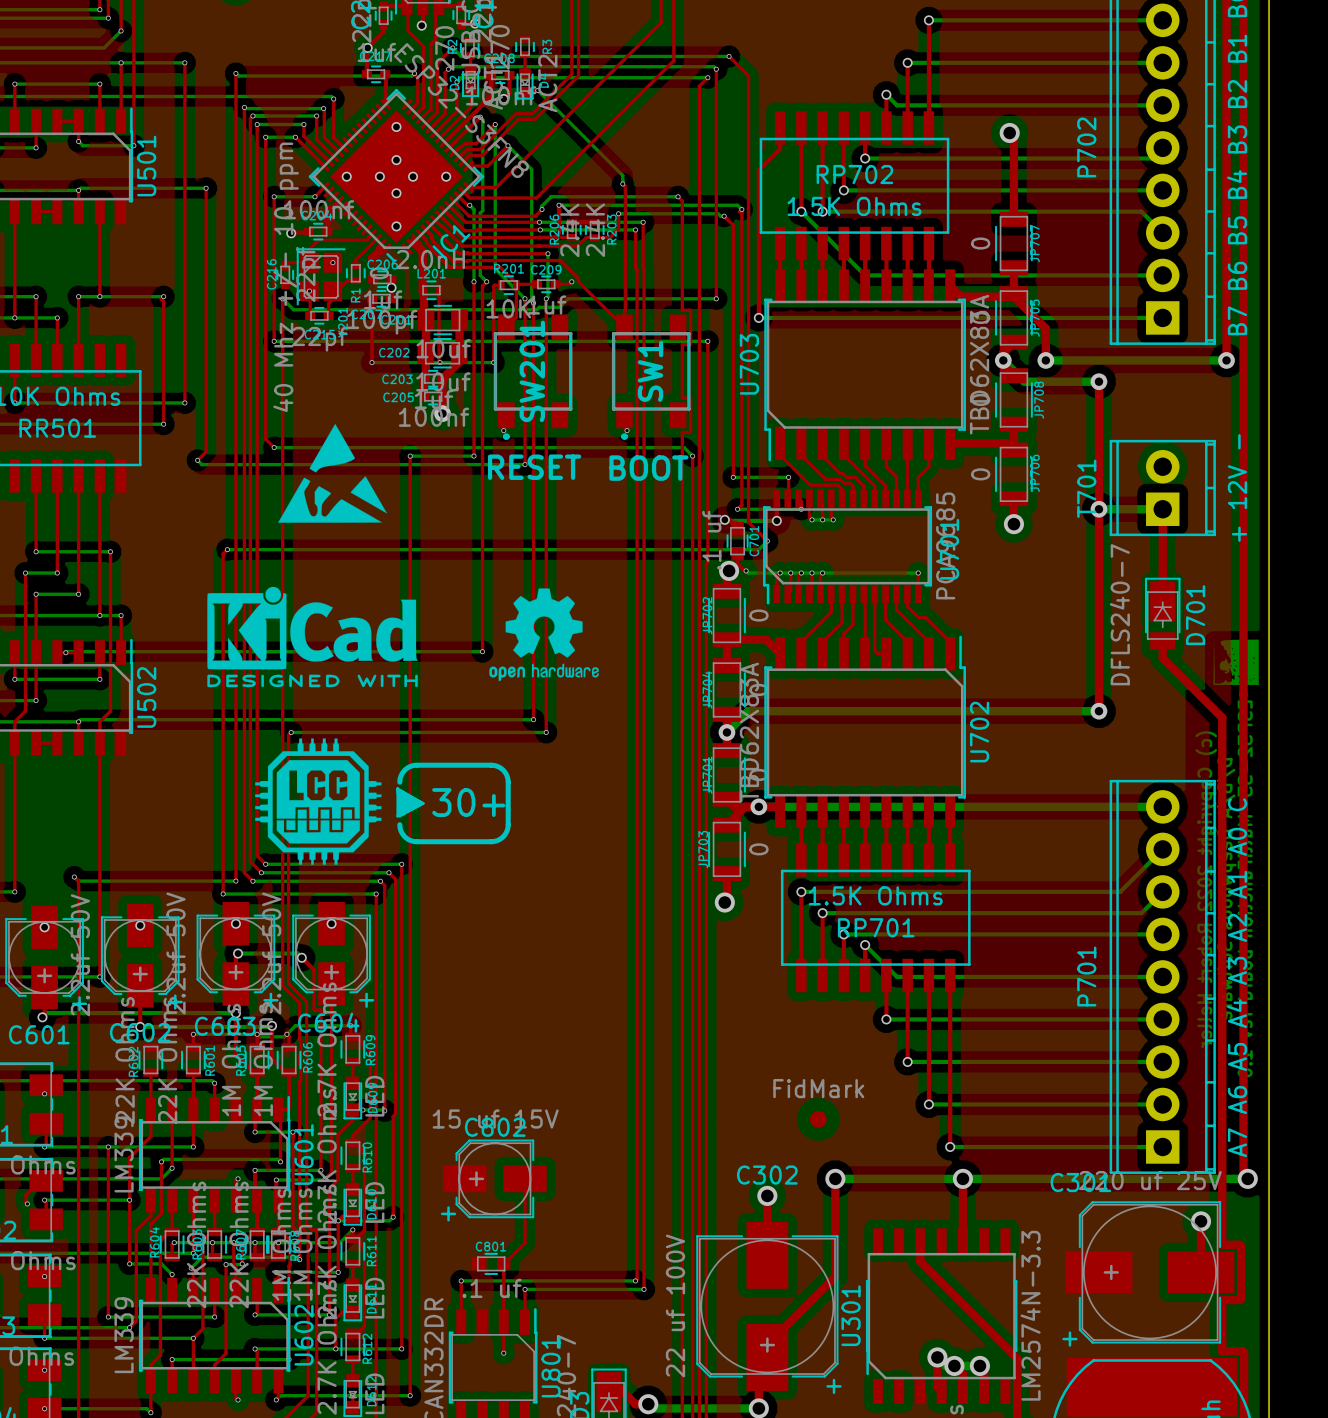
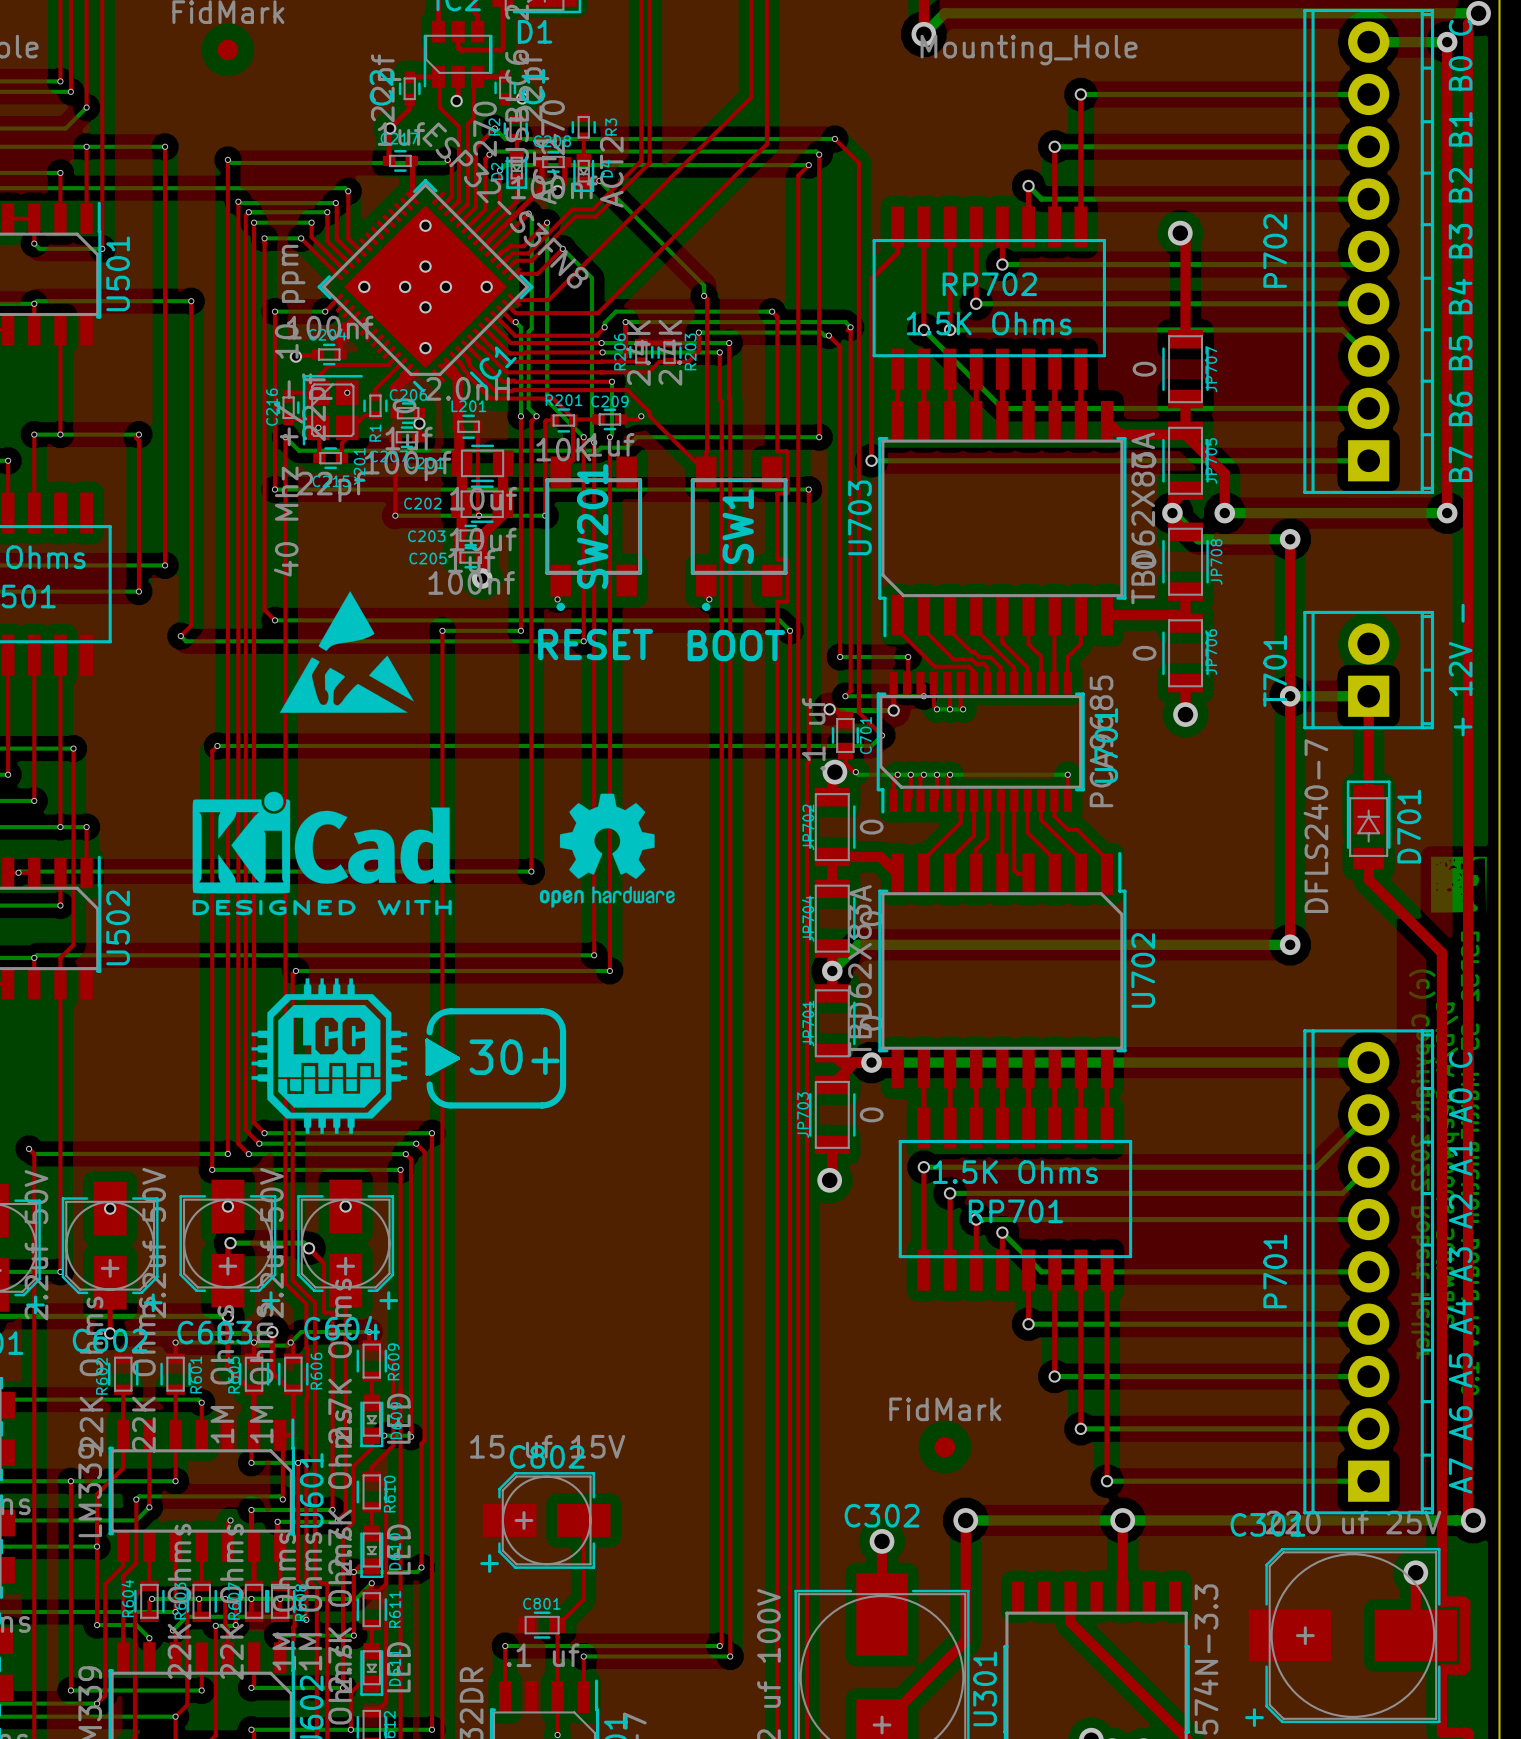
drawing shape: [1213, 638, 1259, 685] -> [1431, 856, 1487, 914]

